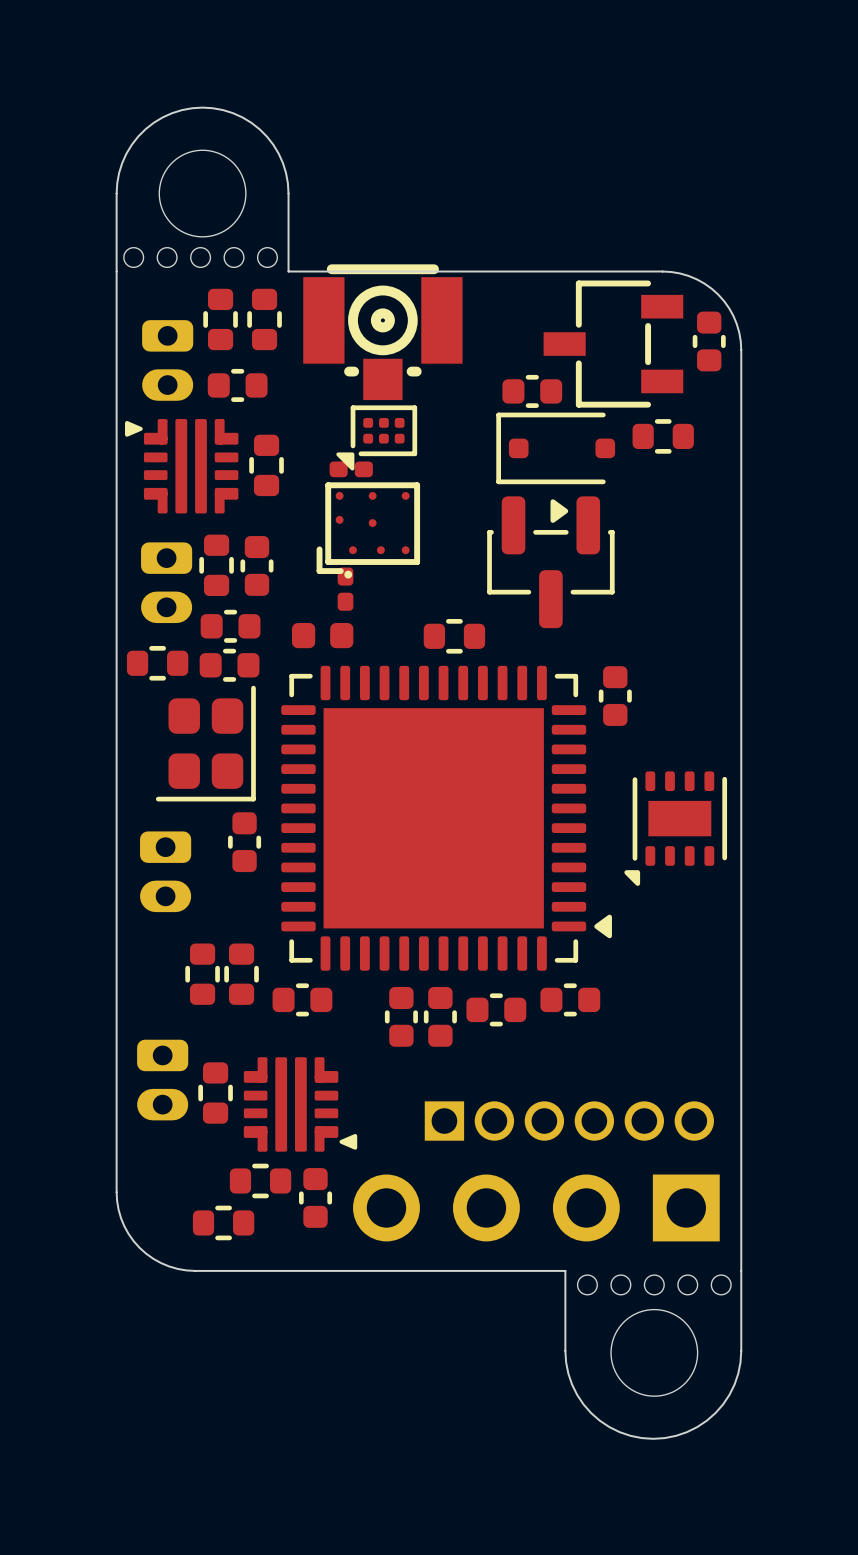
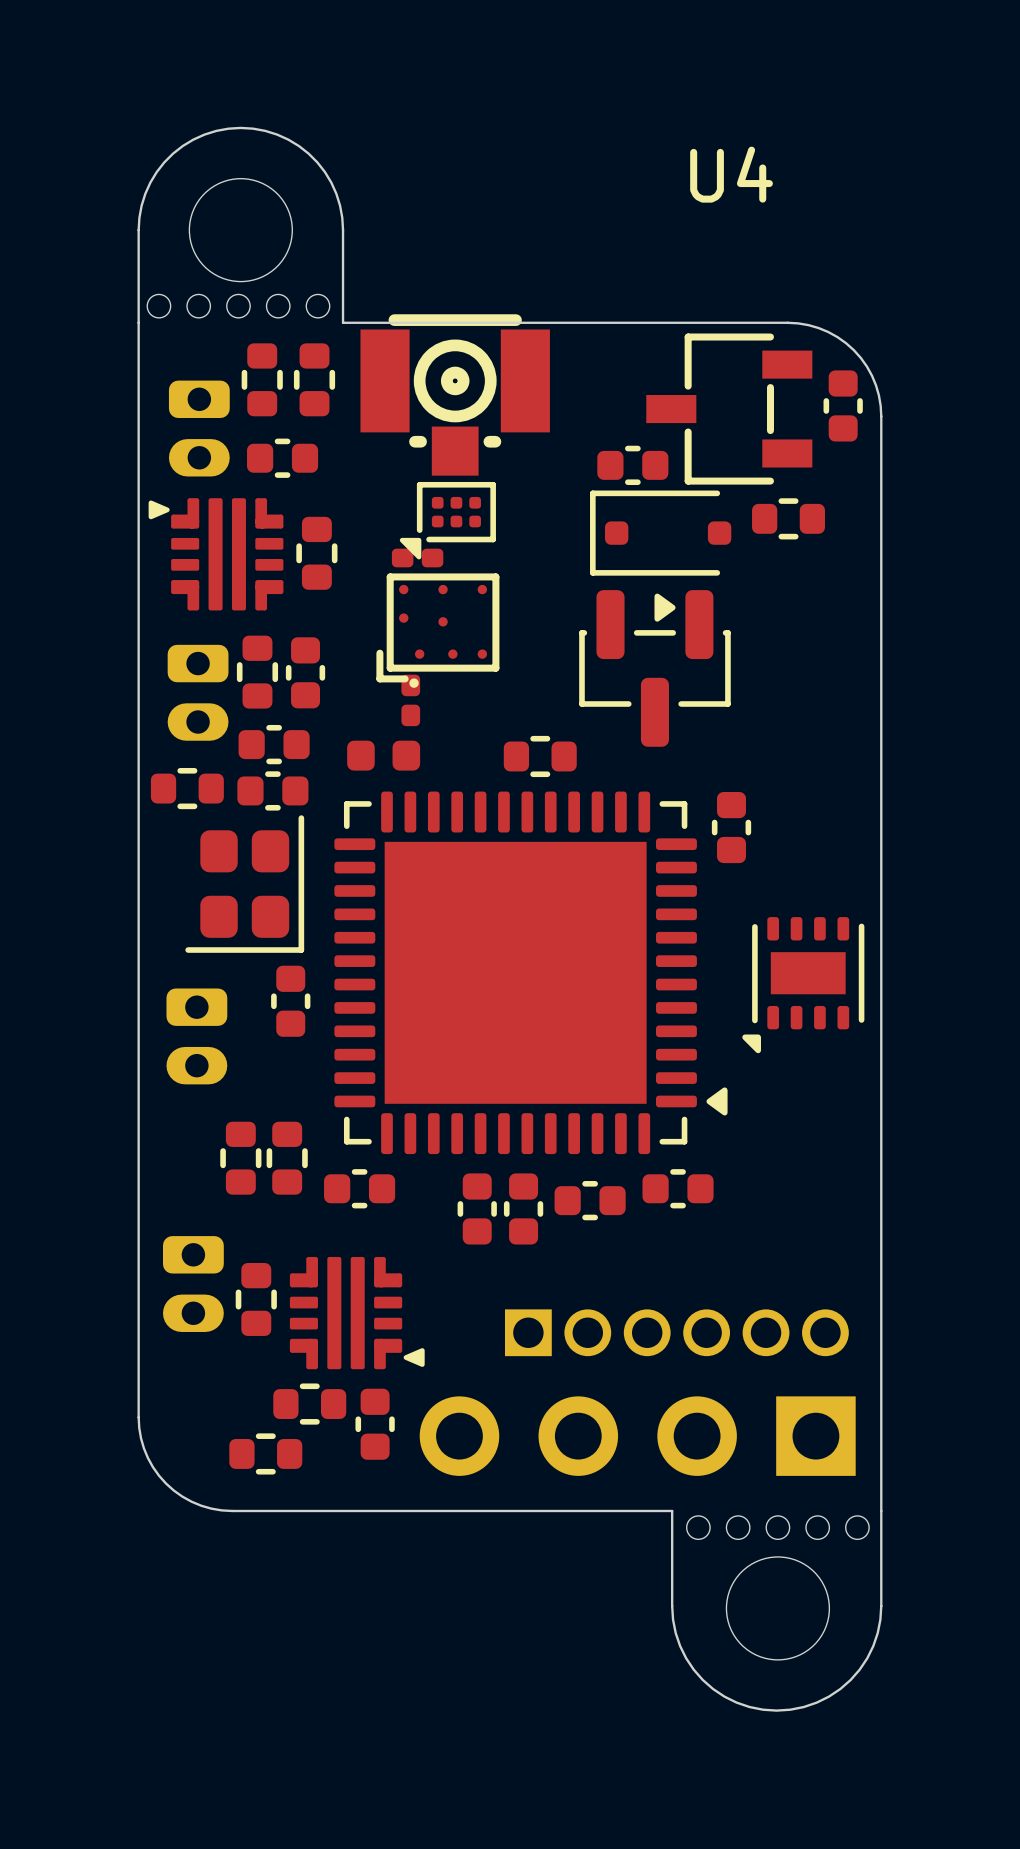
U4 name: none -> U4 (731, 174)

